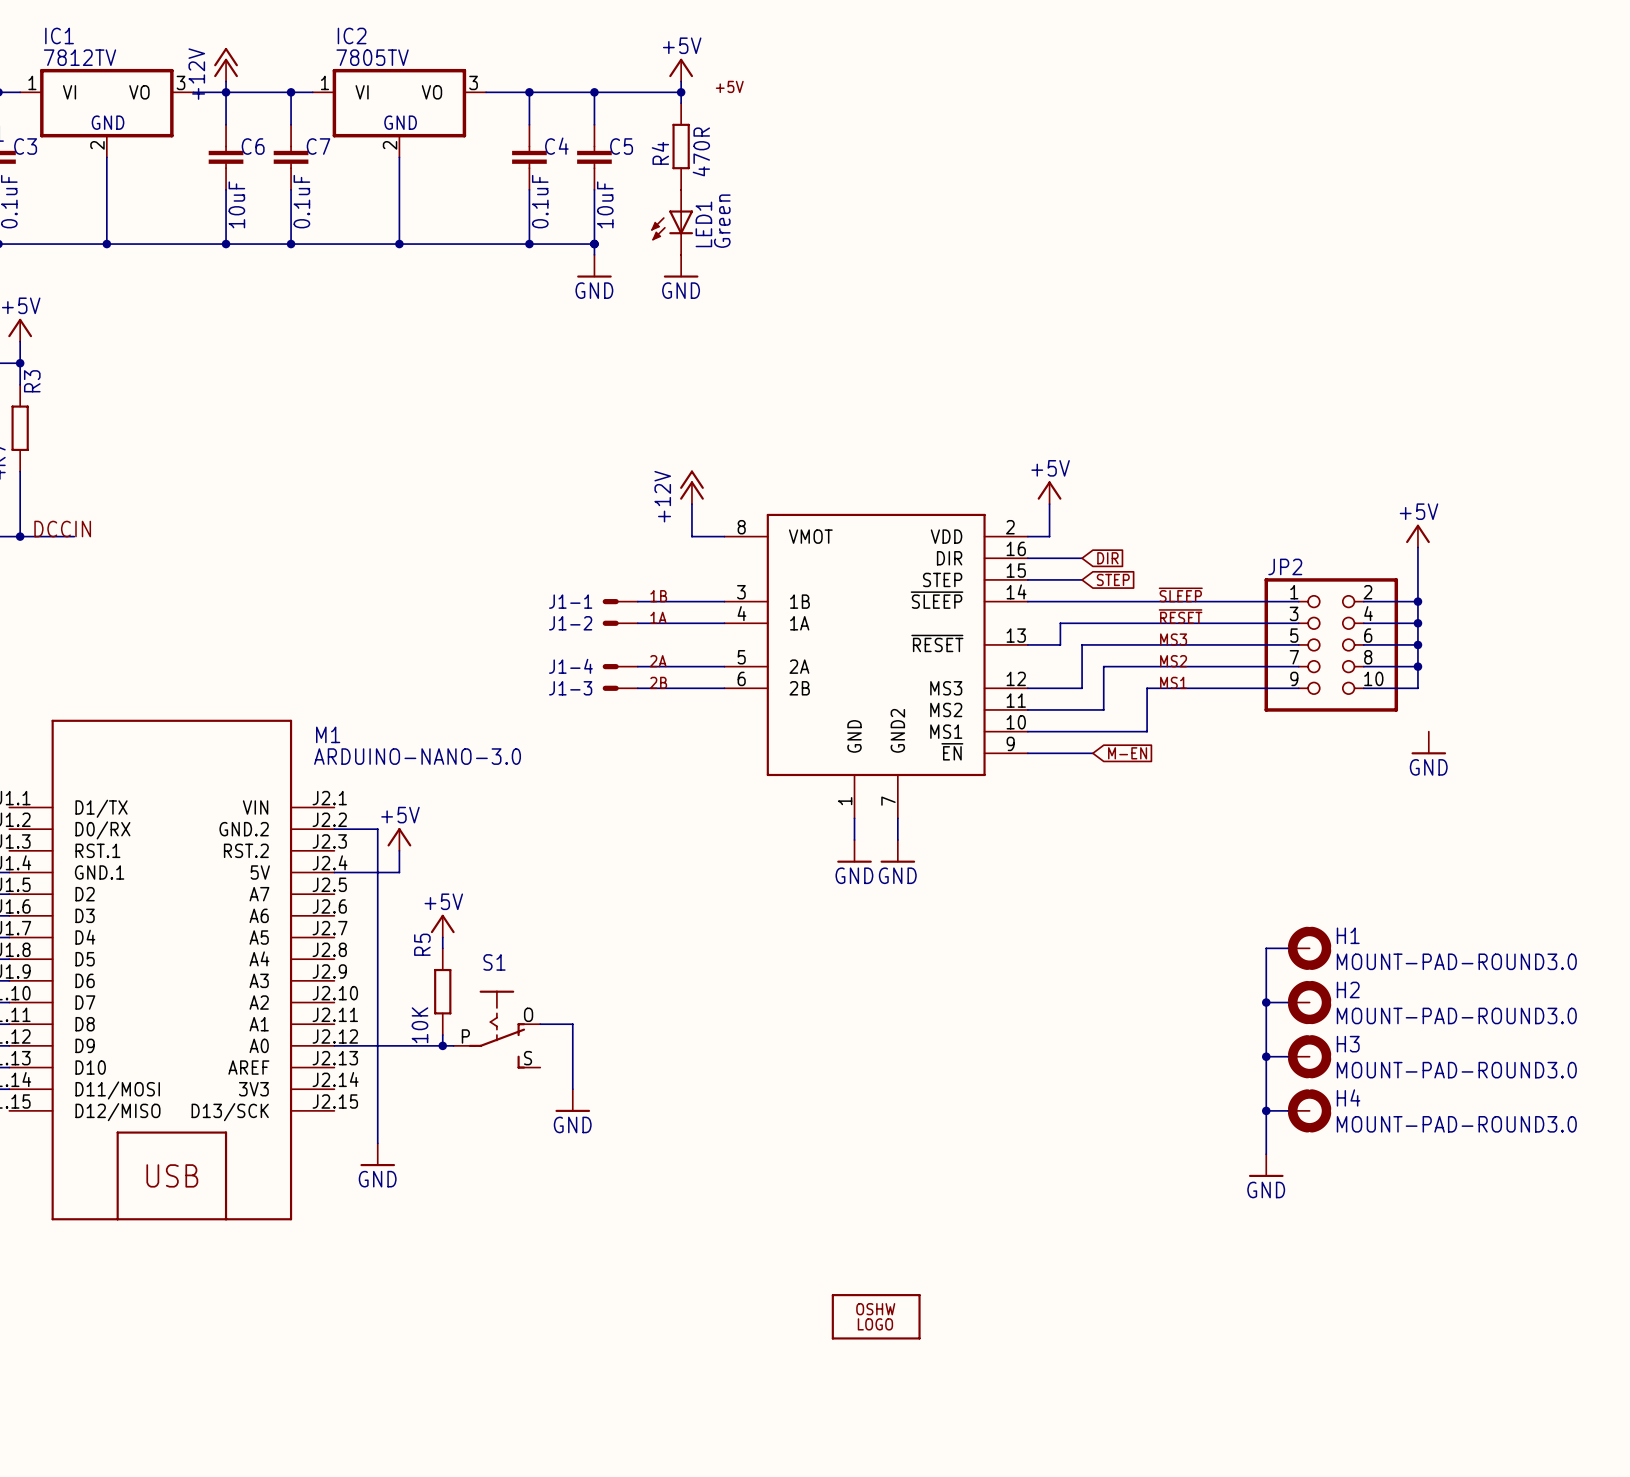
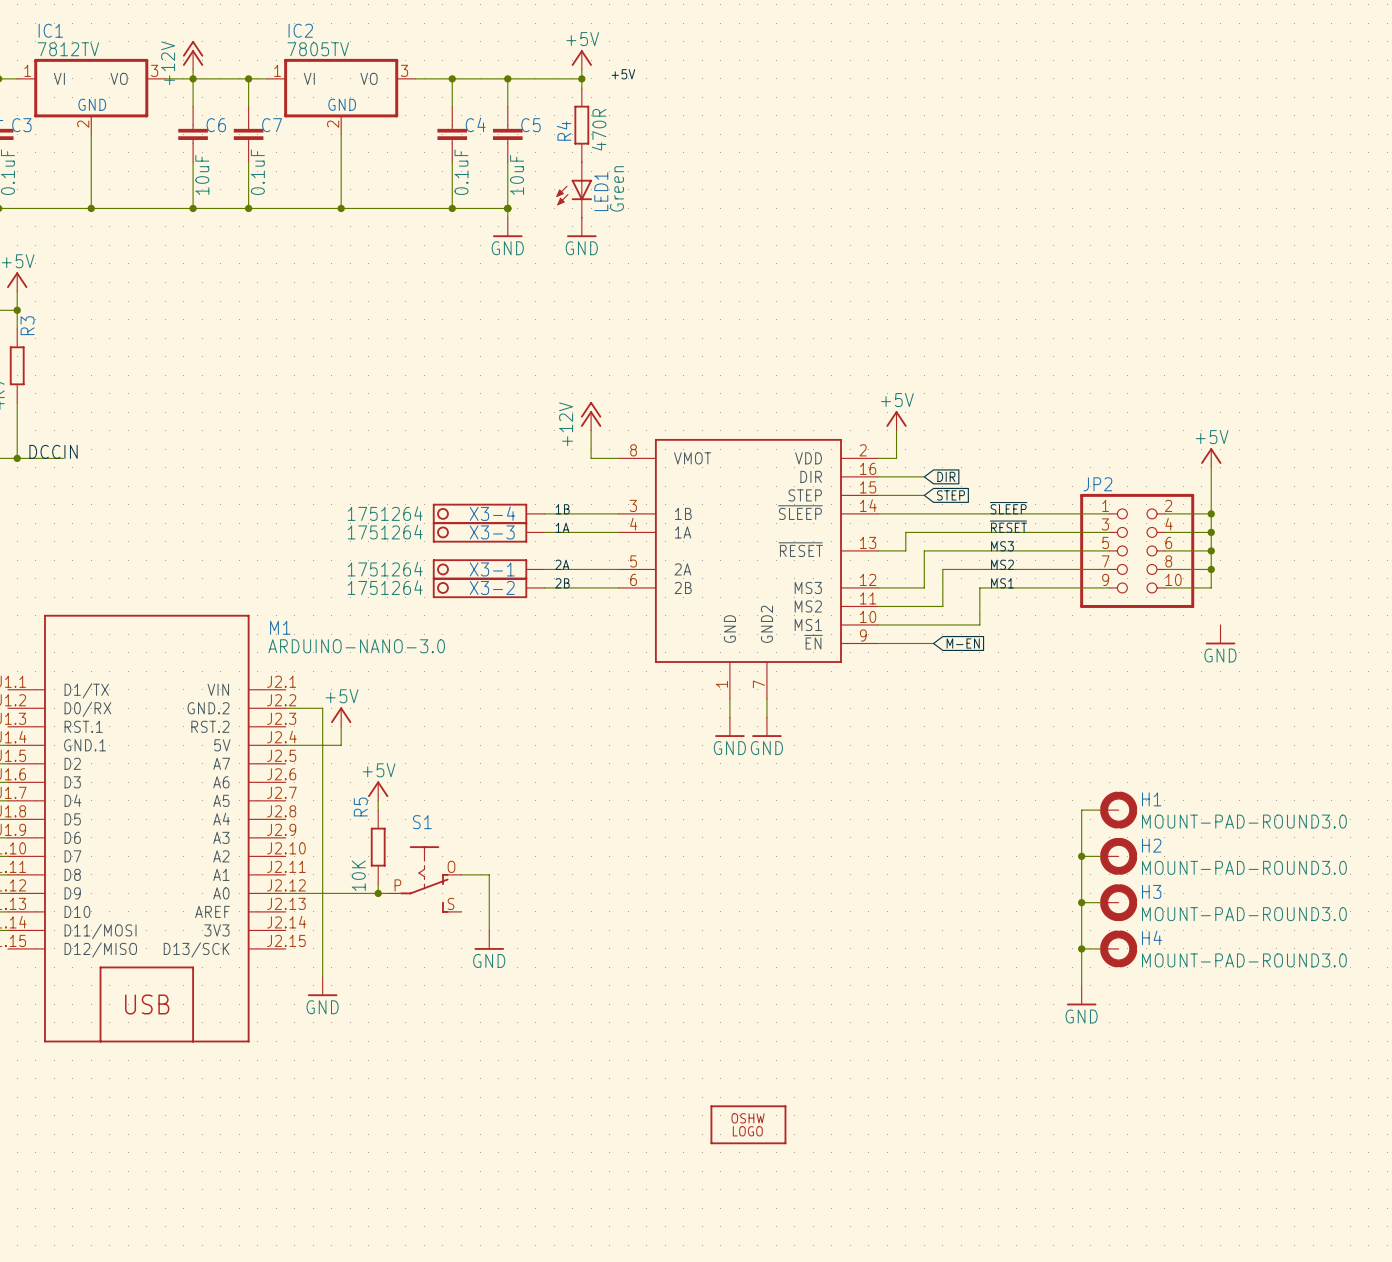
X3-4: none -> 1751264 (488, 513)
J1-1: (620, 601) -> none
X3-3: none -> 1751264 (488, 532)
J1-2: (620, 623) -> none
X3-1: none -> 1751264 (488, 569)
J1-4: (620, 666) -> none
X3-2: none -> 1751264 (488, 587)
J1-3: (620, 688) -> none

